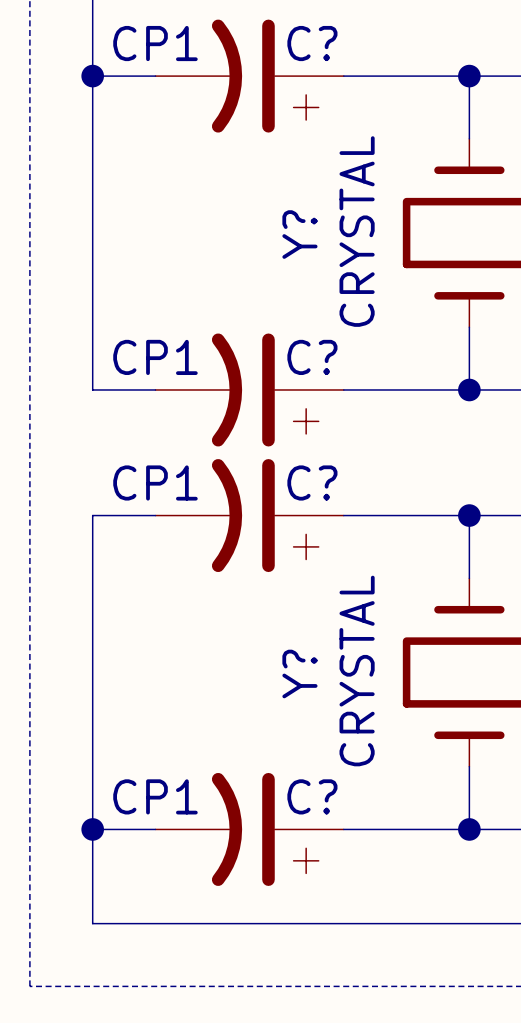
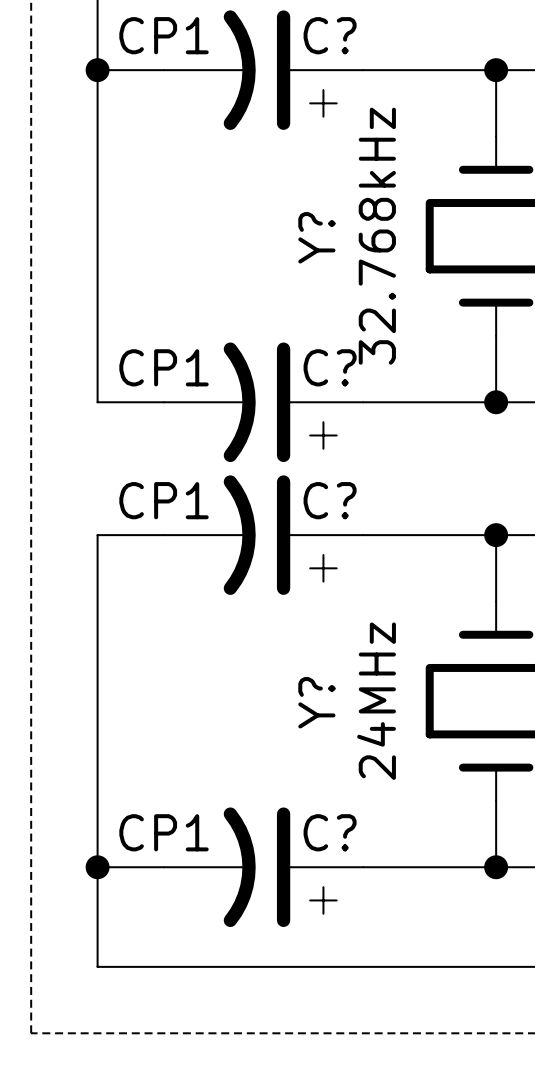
Y? value: CRYSTAL (357, 231) -> 32.768kHz (377, 236)
Y? value: CRYSTAL (357, 671) -> 24MHz (376, 701)

